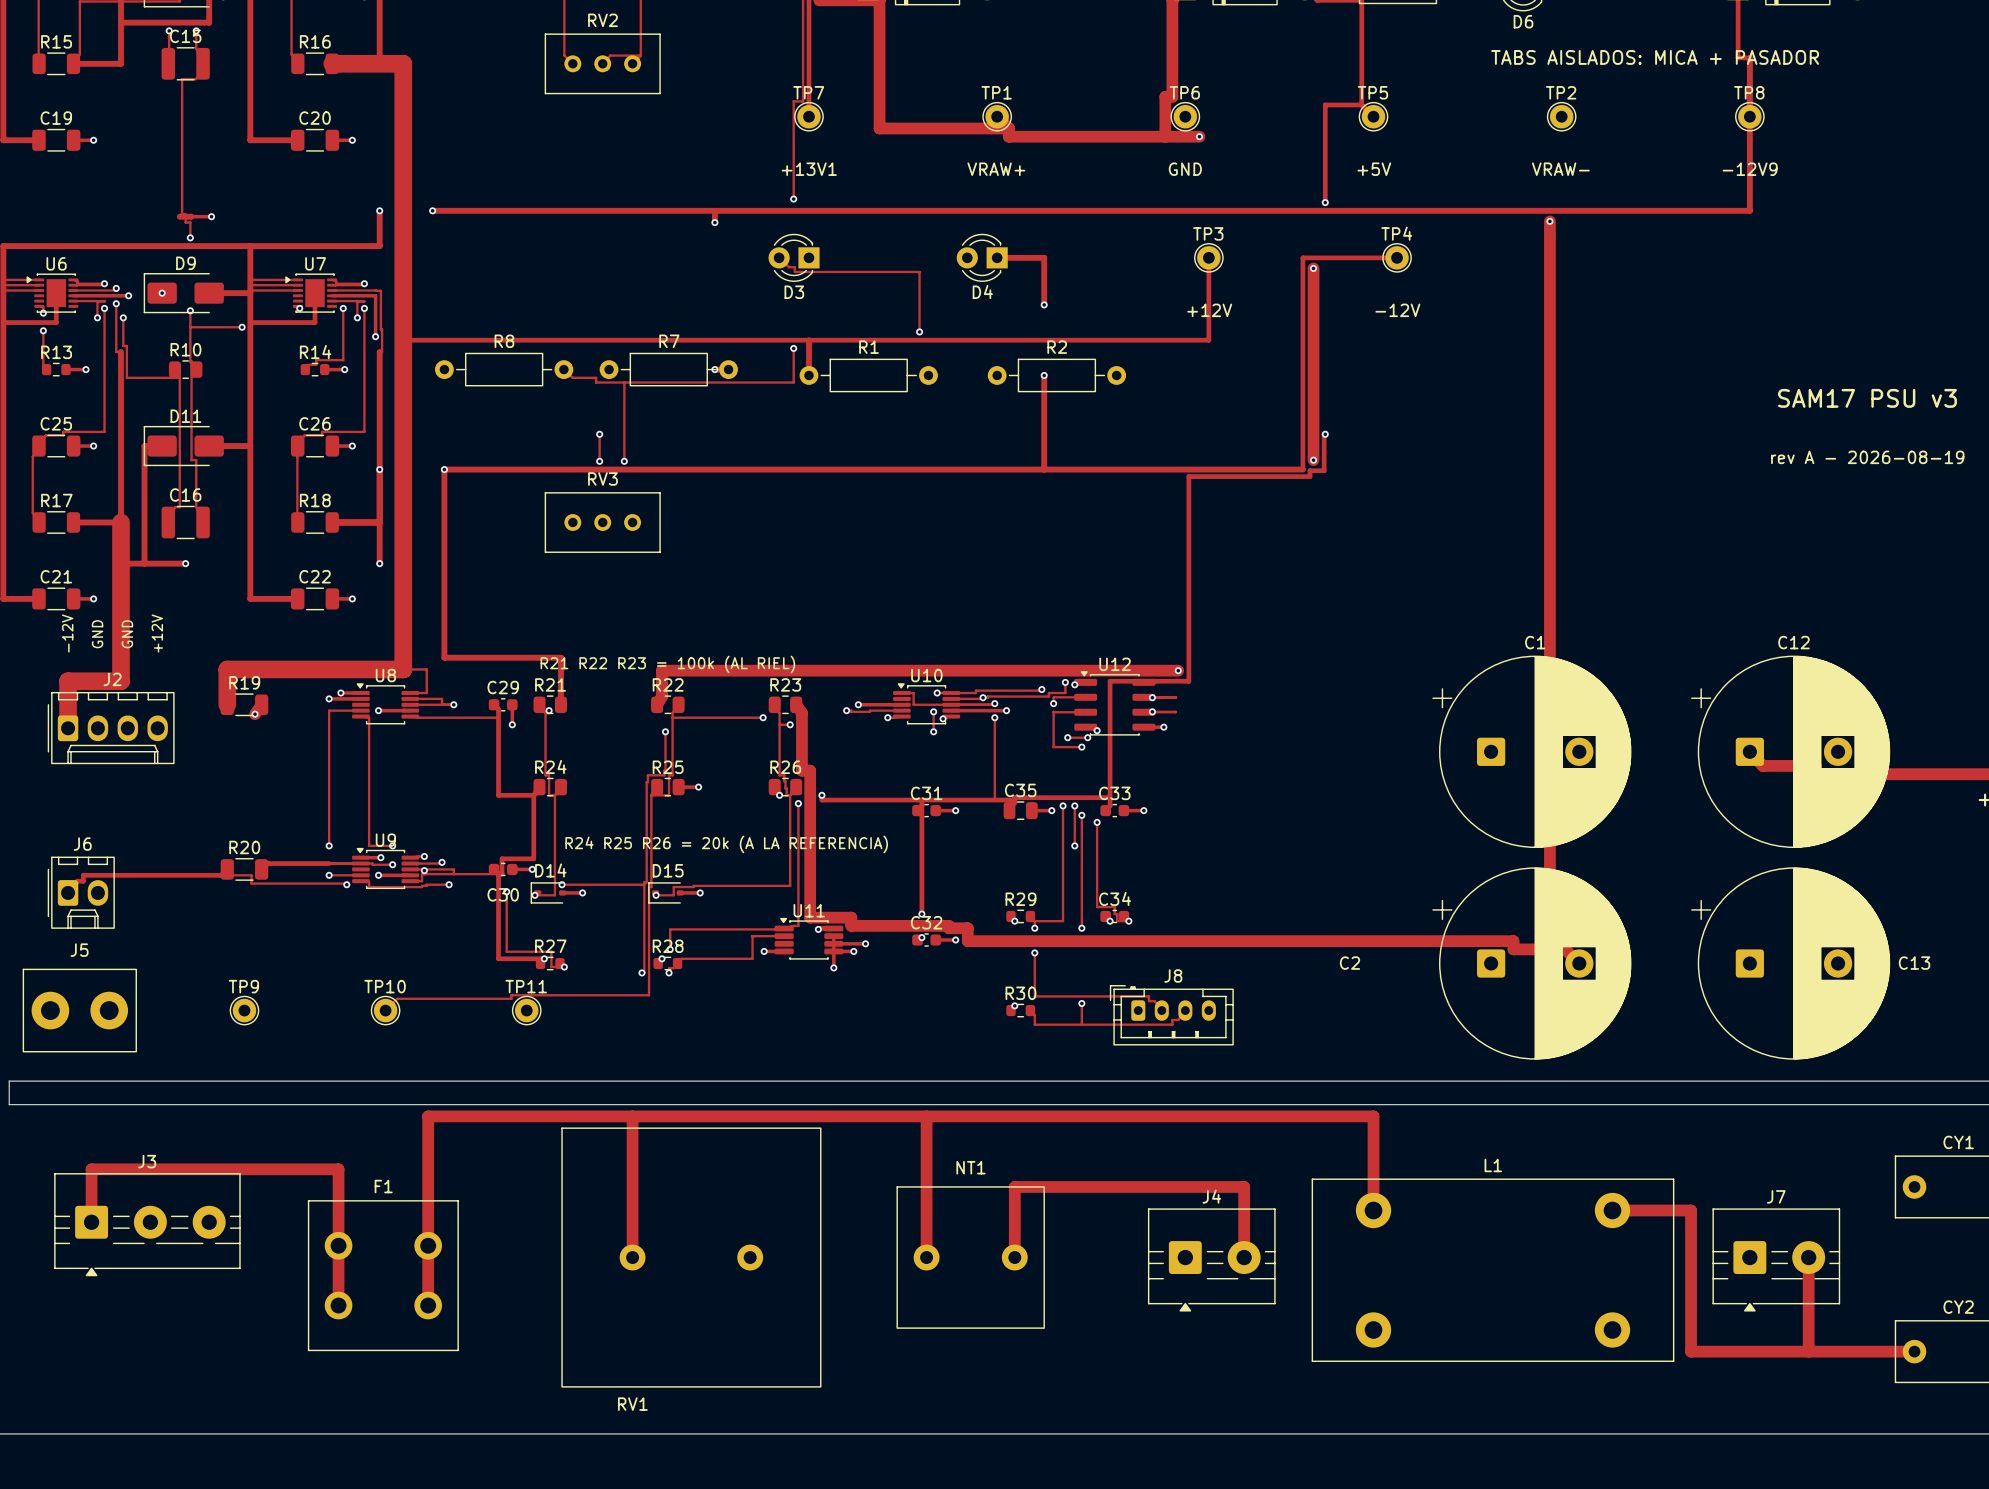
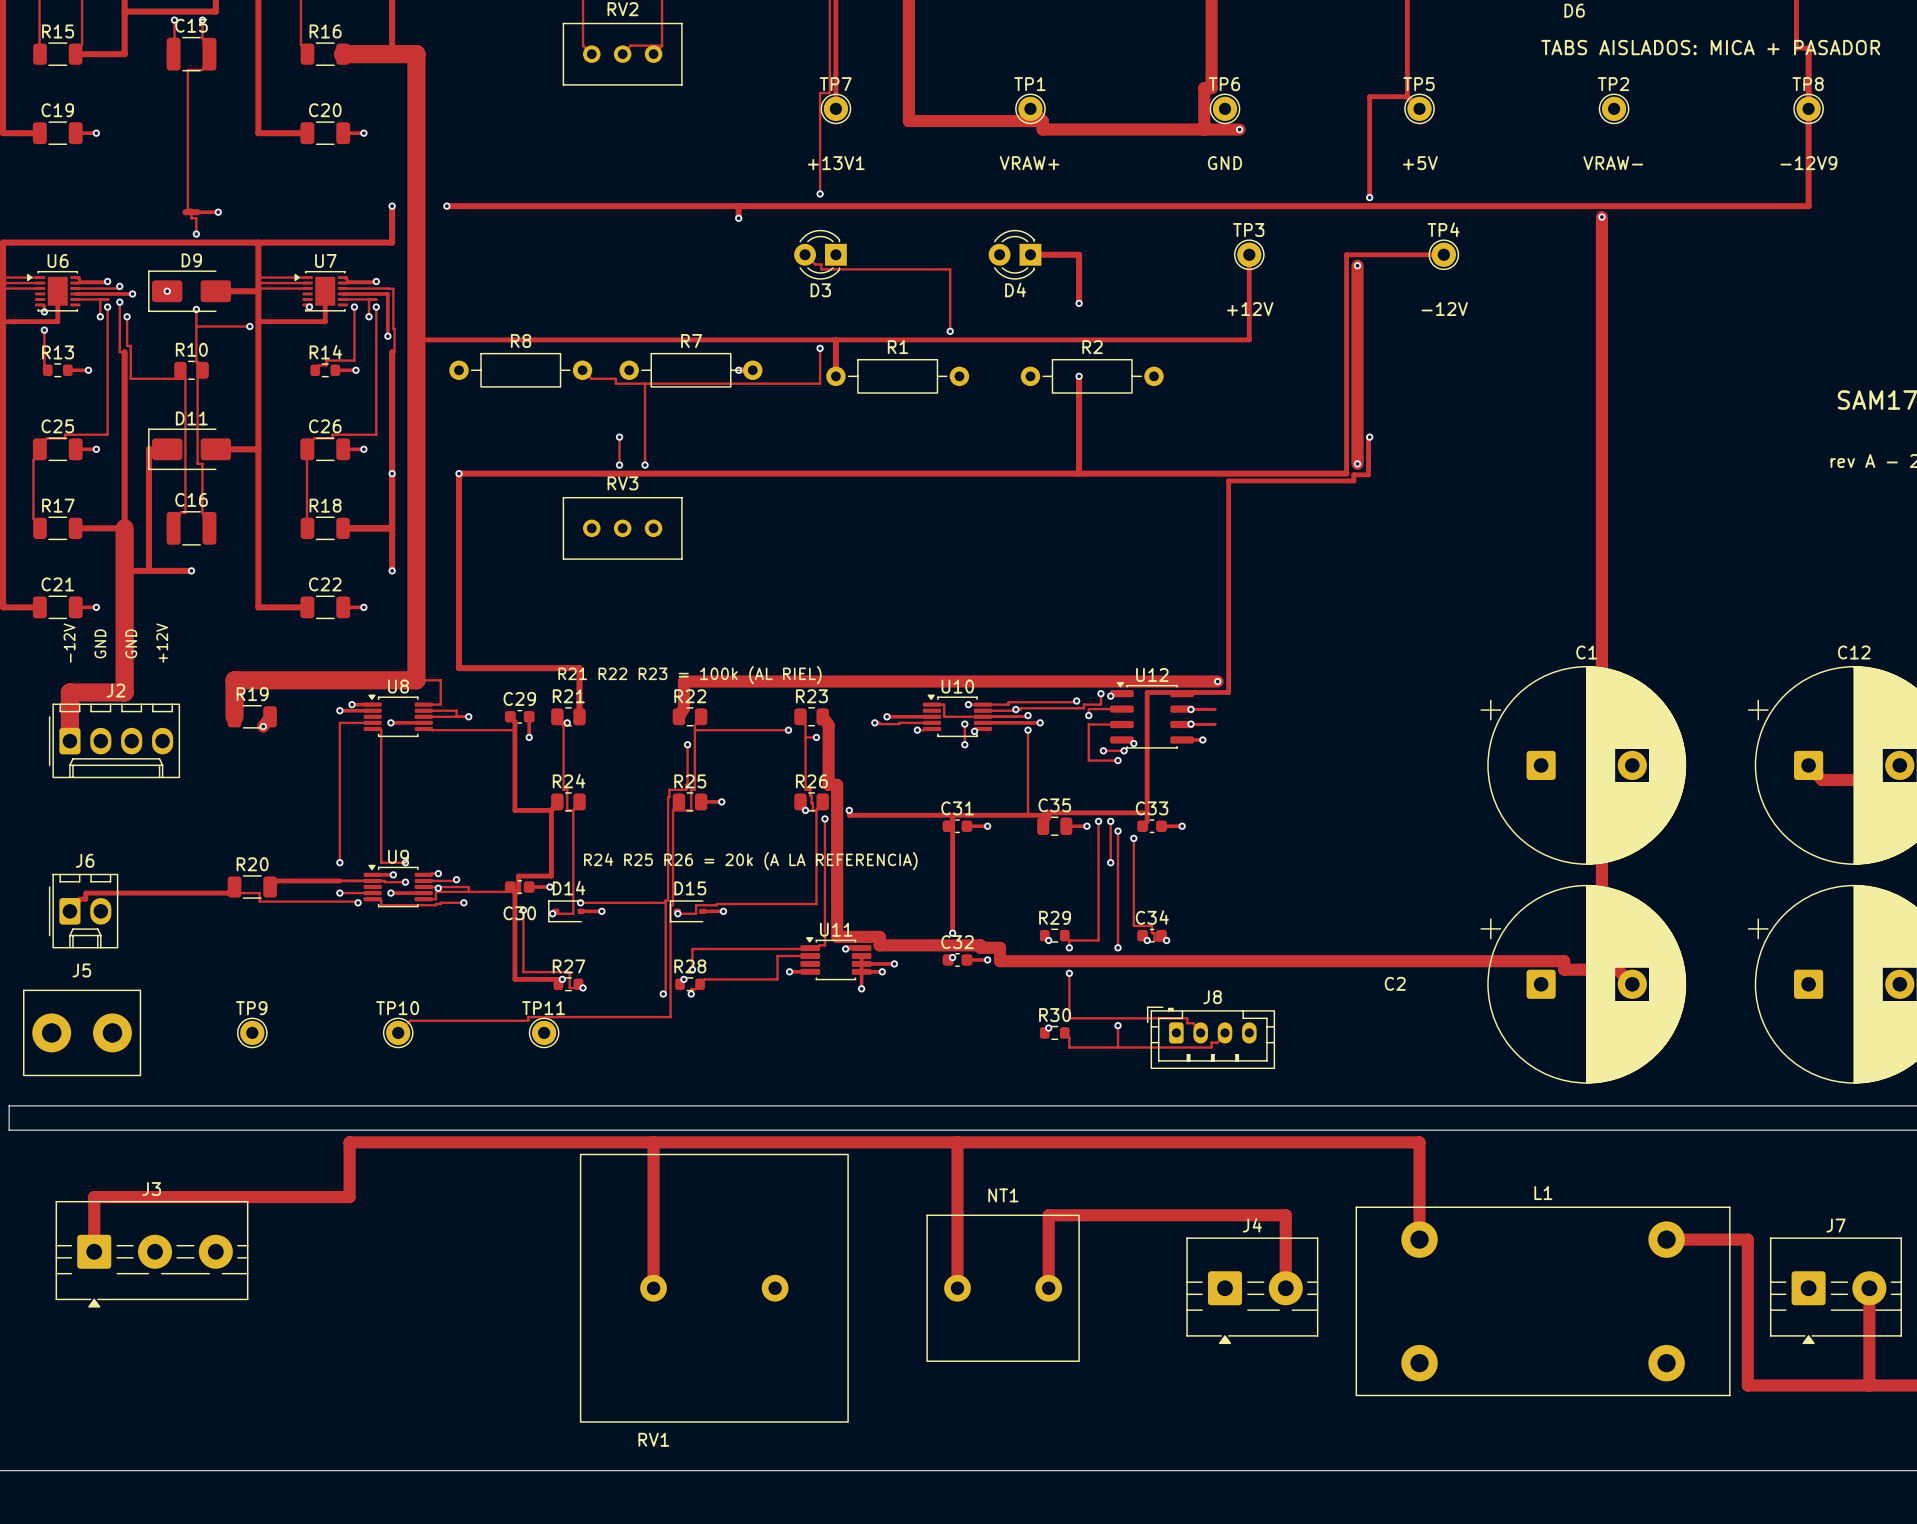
track: (428, 1116) (428, 1305) -> (442, 1142) (349, 1142) (349, 1197)
track: (338, 1169) (338, 1305) -> none
F1: (383, 1275) -> none

